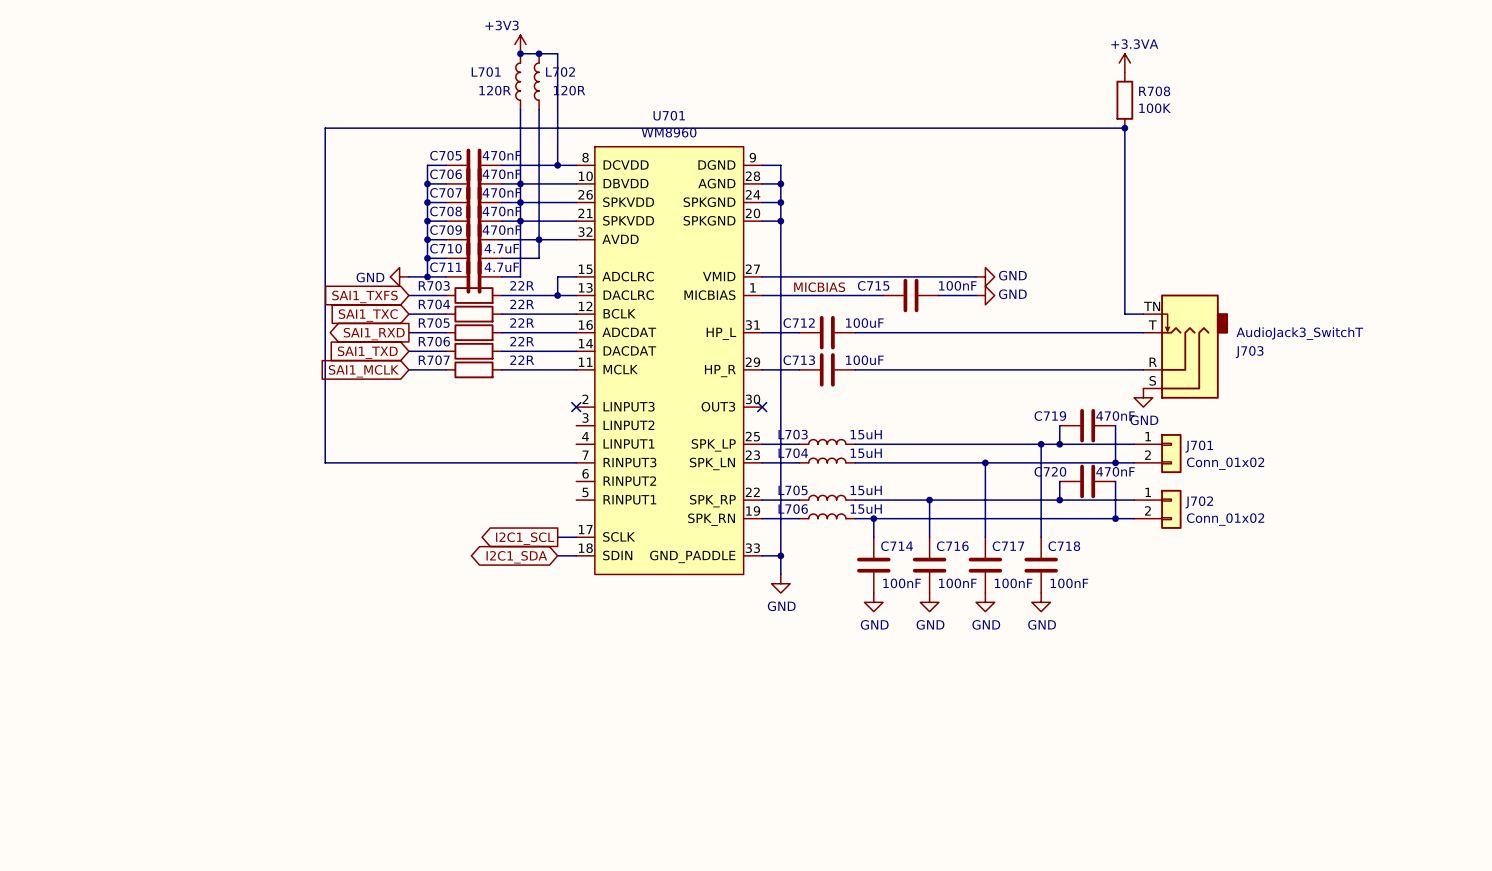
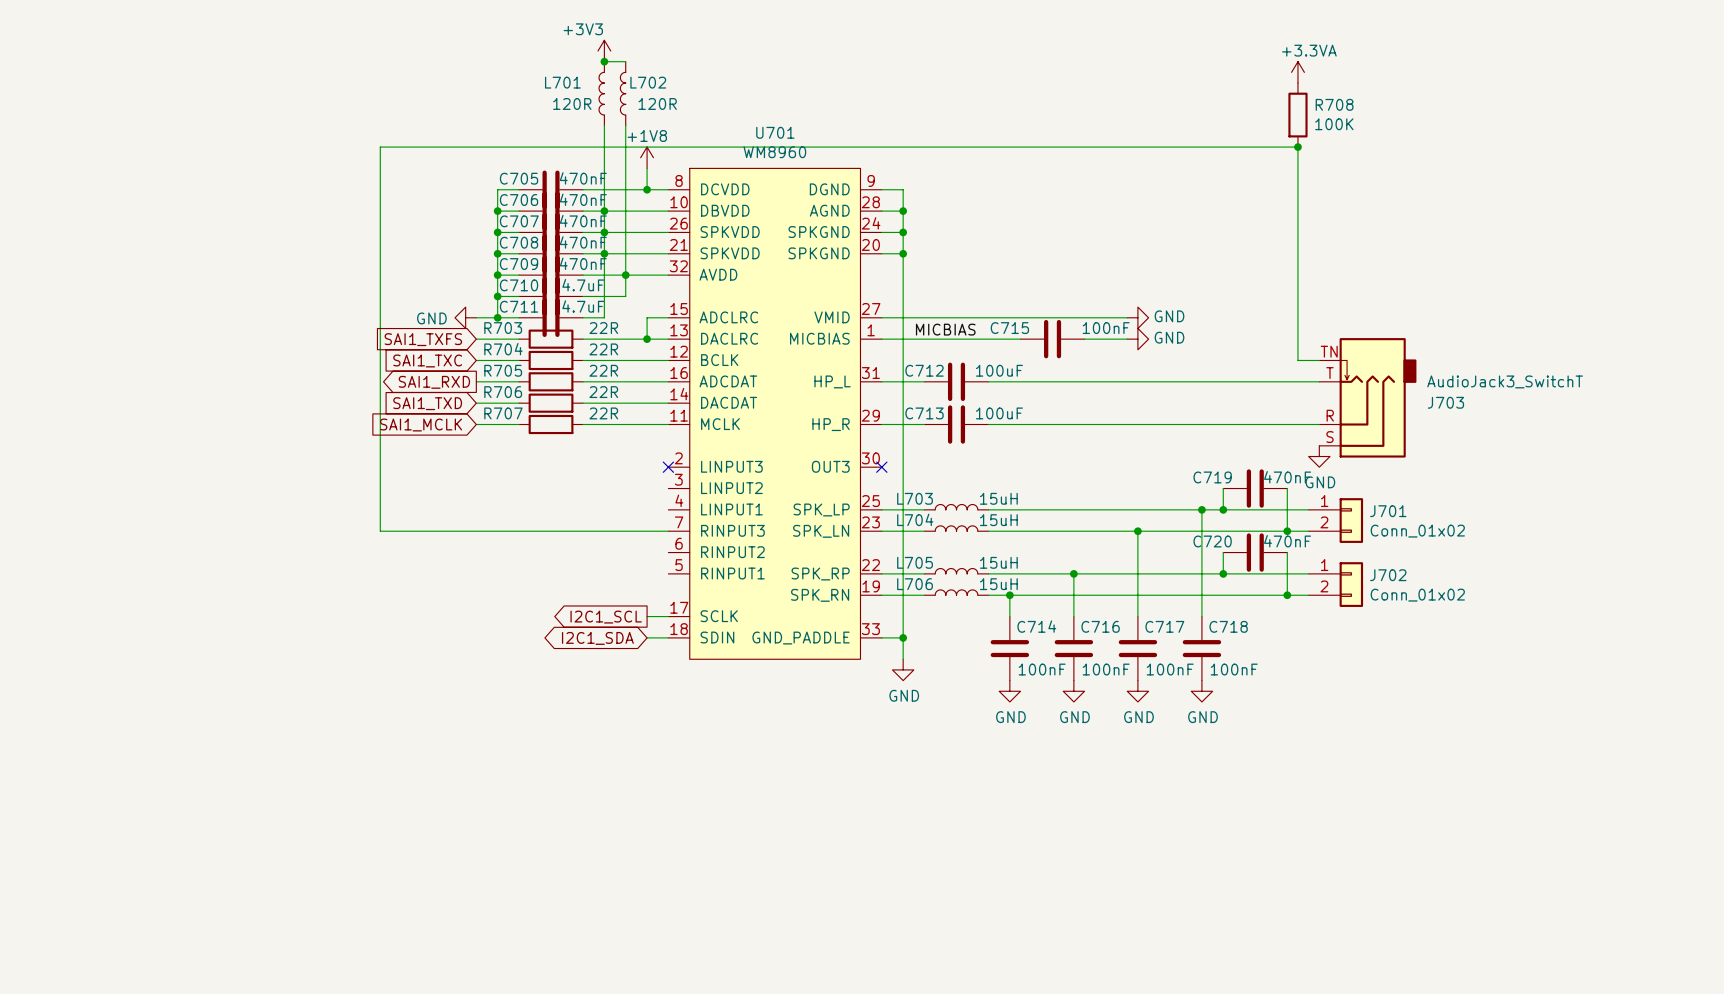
wire: (539, 53) (557, 53) (557, 146) -> none
junction: (539, 53) -> none
power symbol: none -> +1V8 (647, 157)

